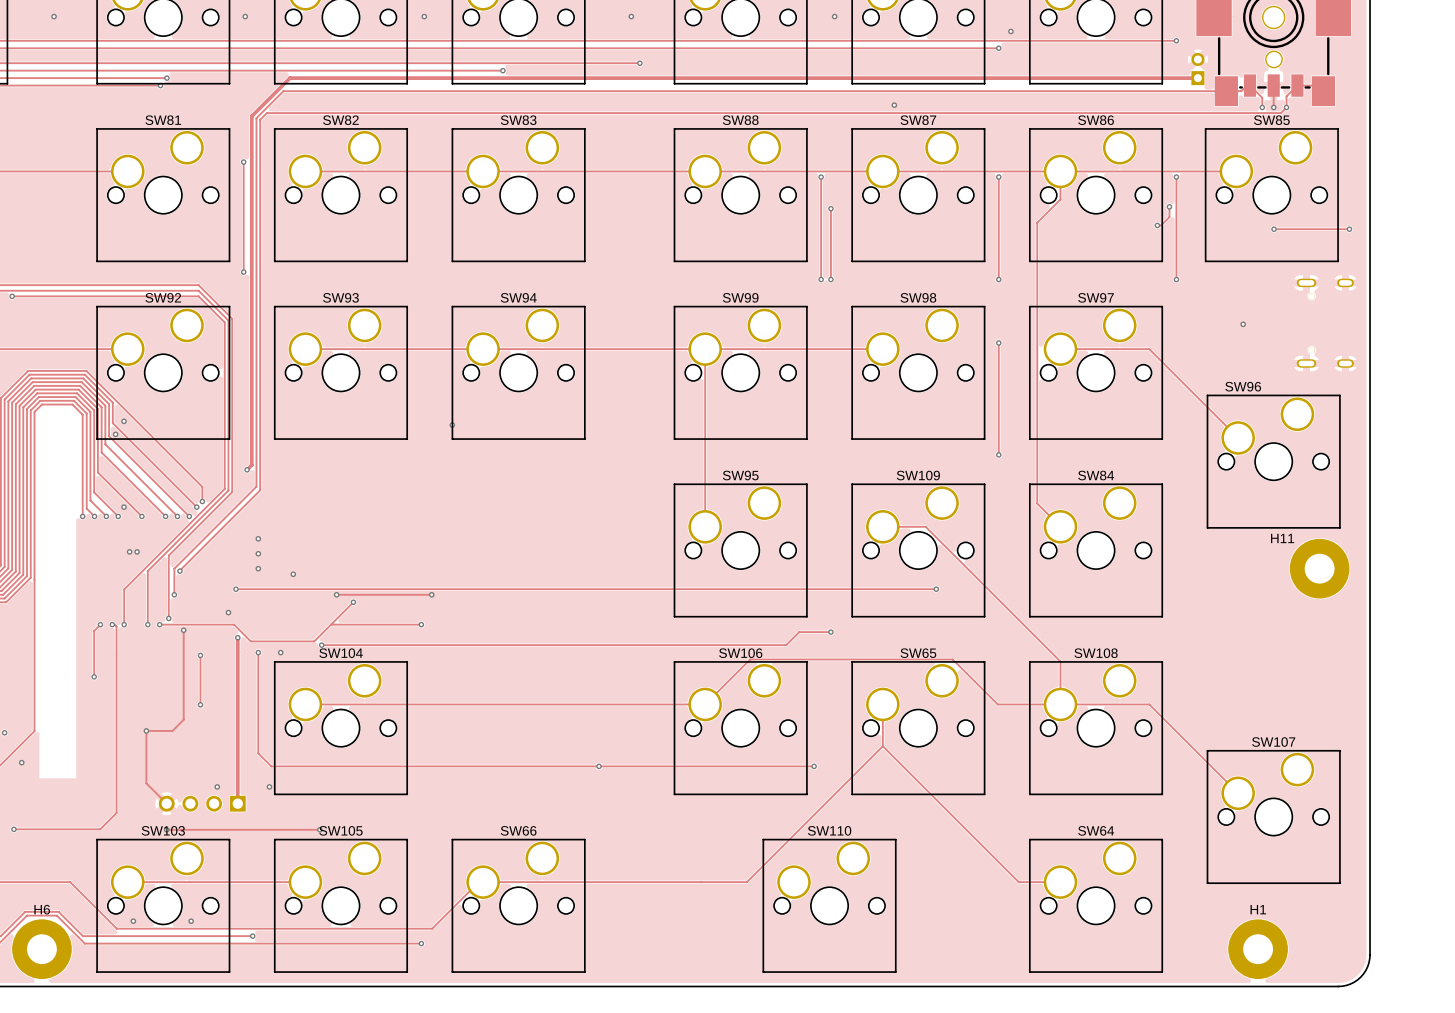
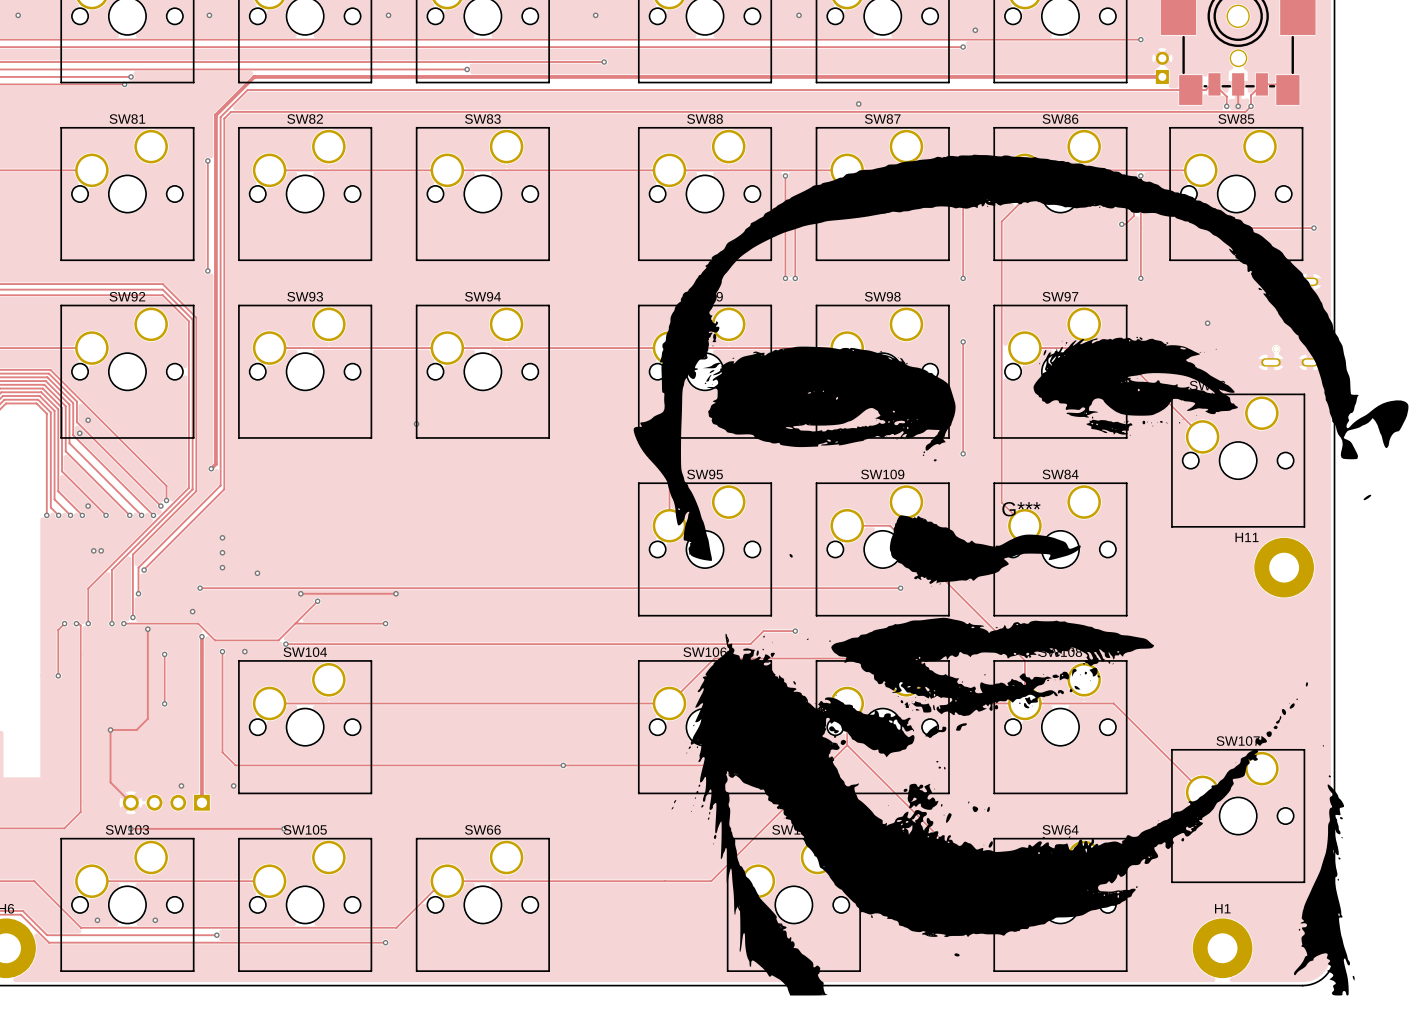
G***: none -> (1021, 575)

